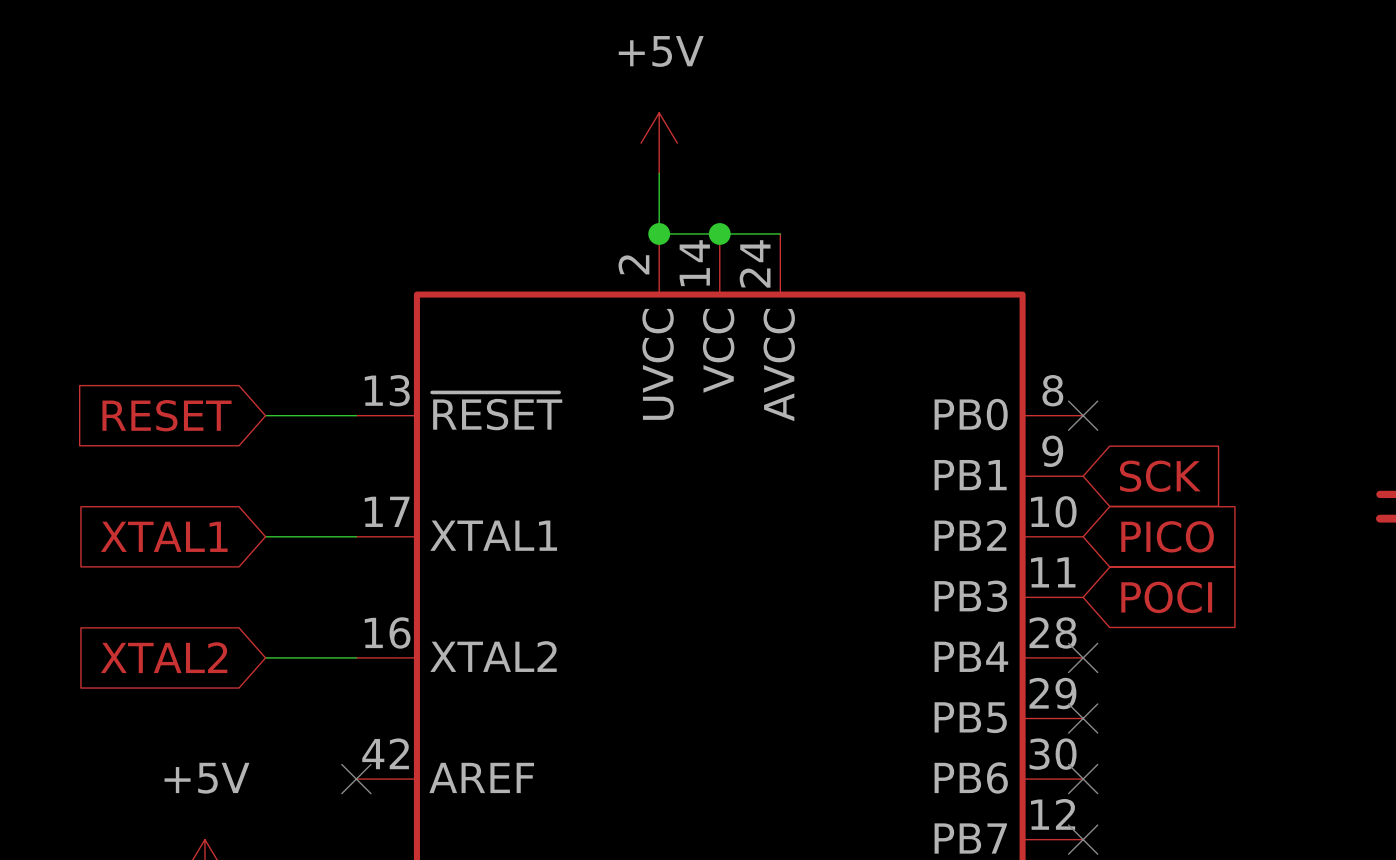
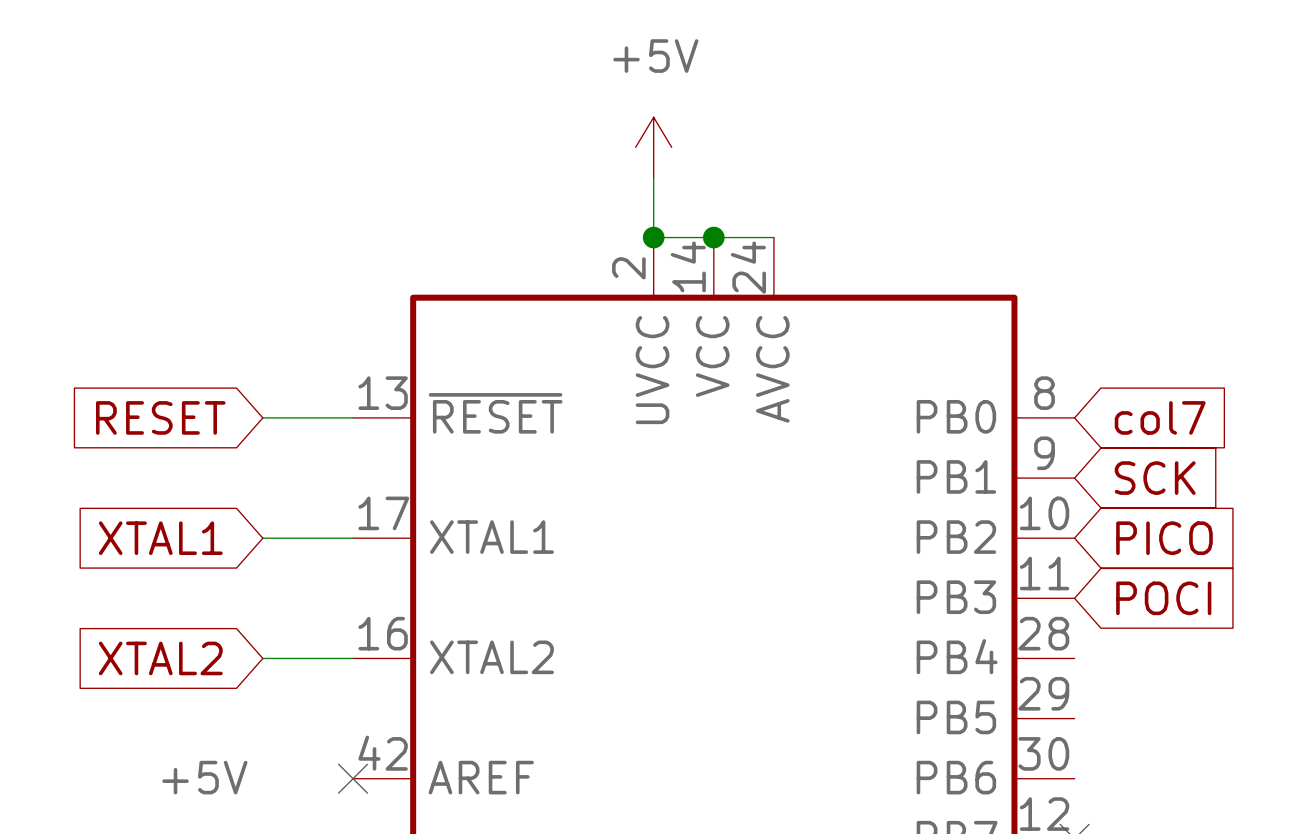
no-connect mark: (1083, 415) -> none
global label: none -> col7 (1160, 417)
no-connect mark: (1083, 657) -> none
no-connect mark: (1083, 718) -> none
no-connect mark: (1083, 779) -> none

